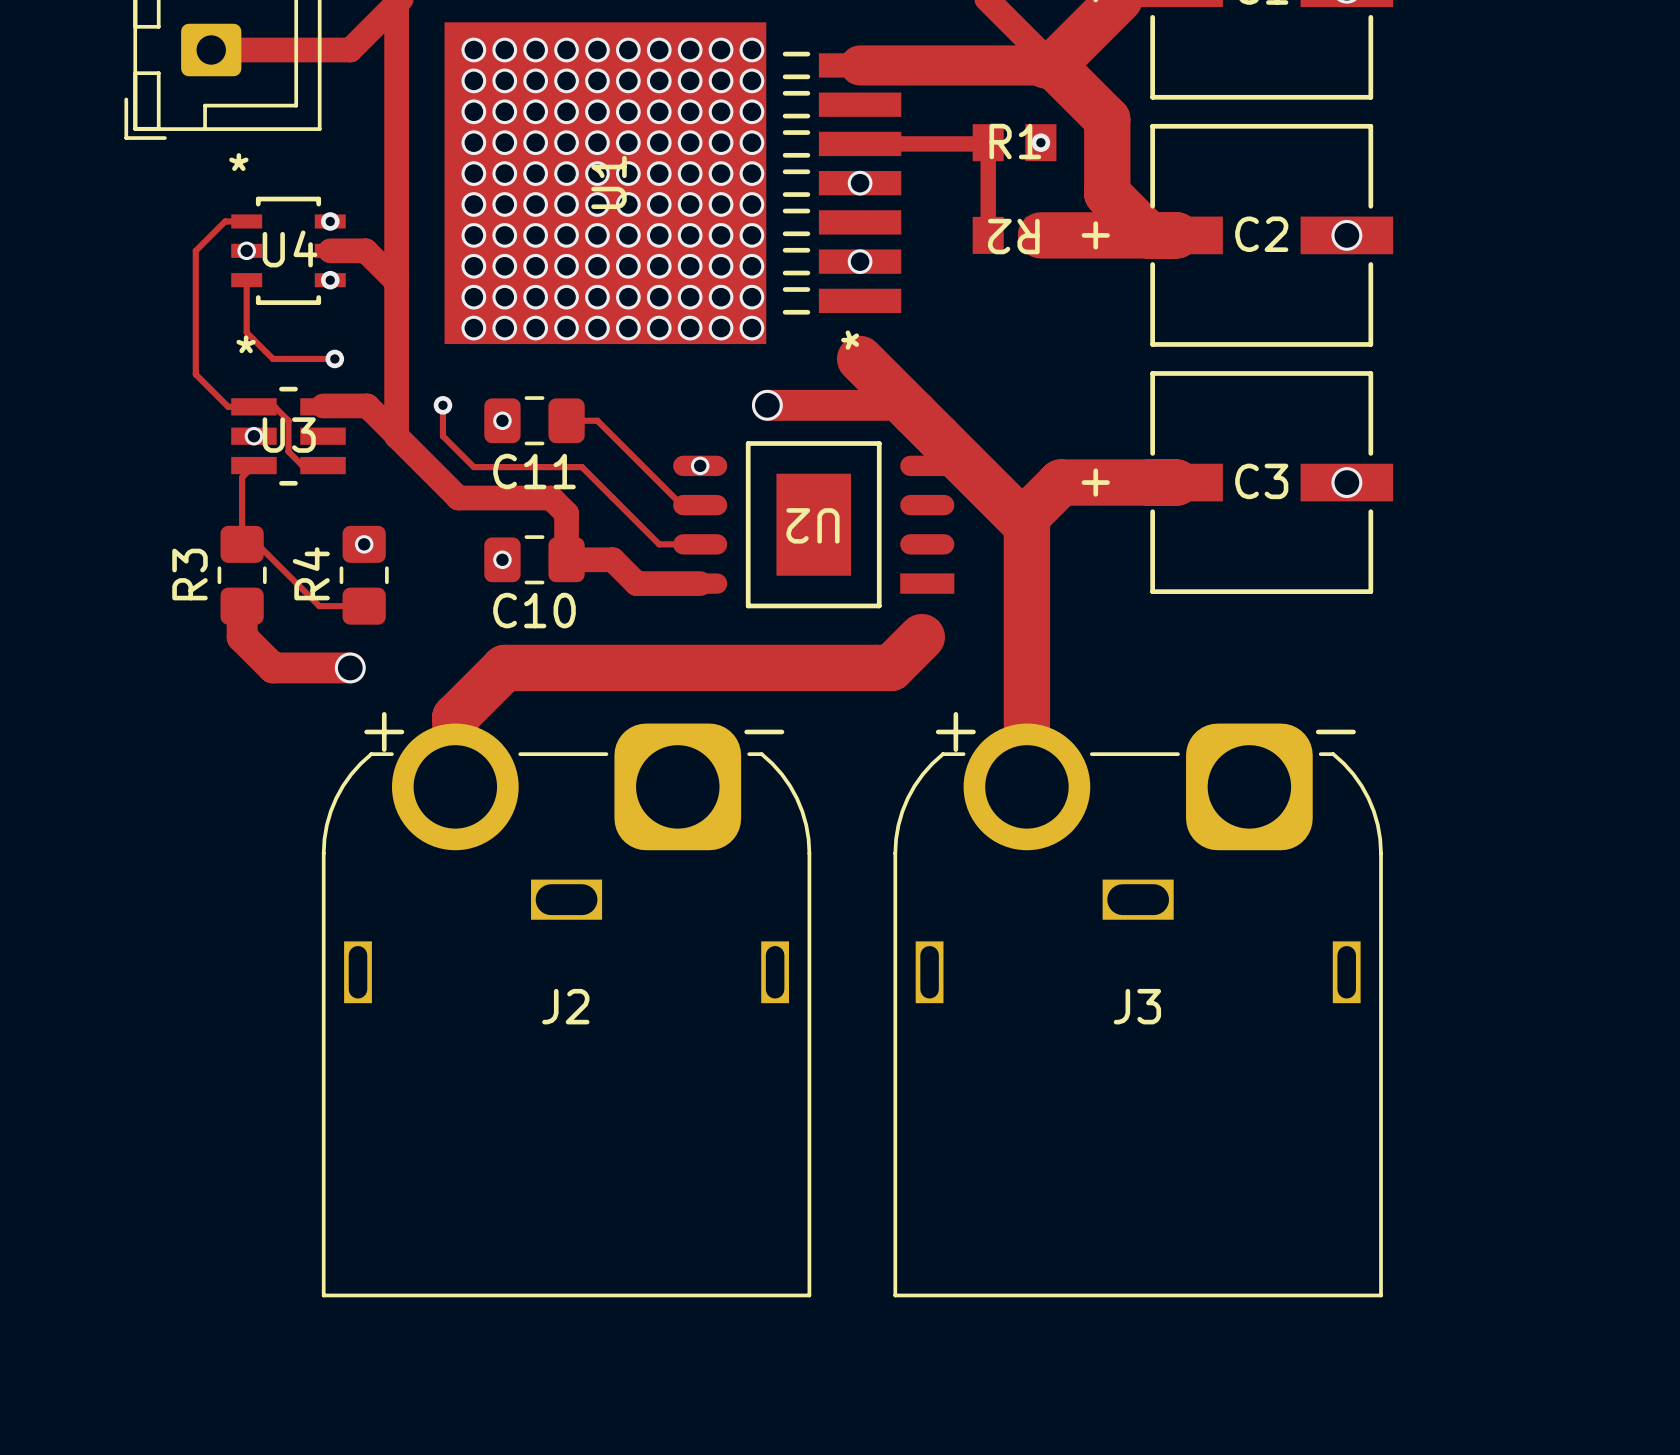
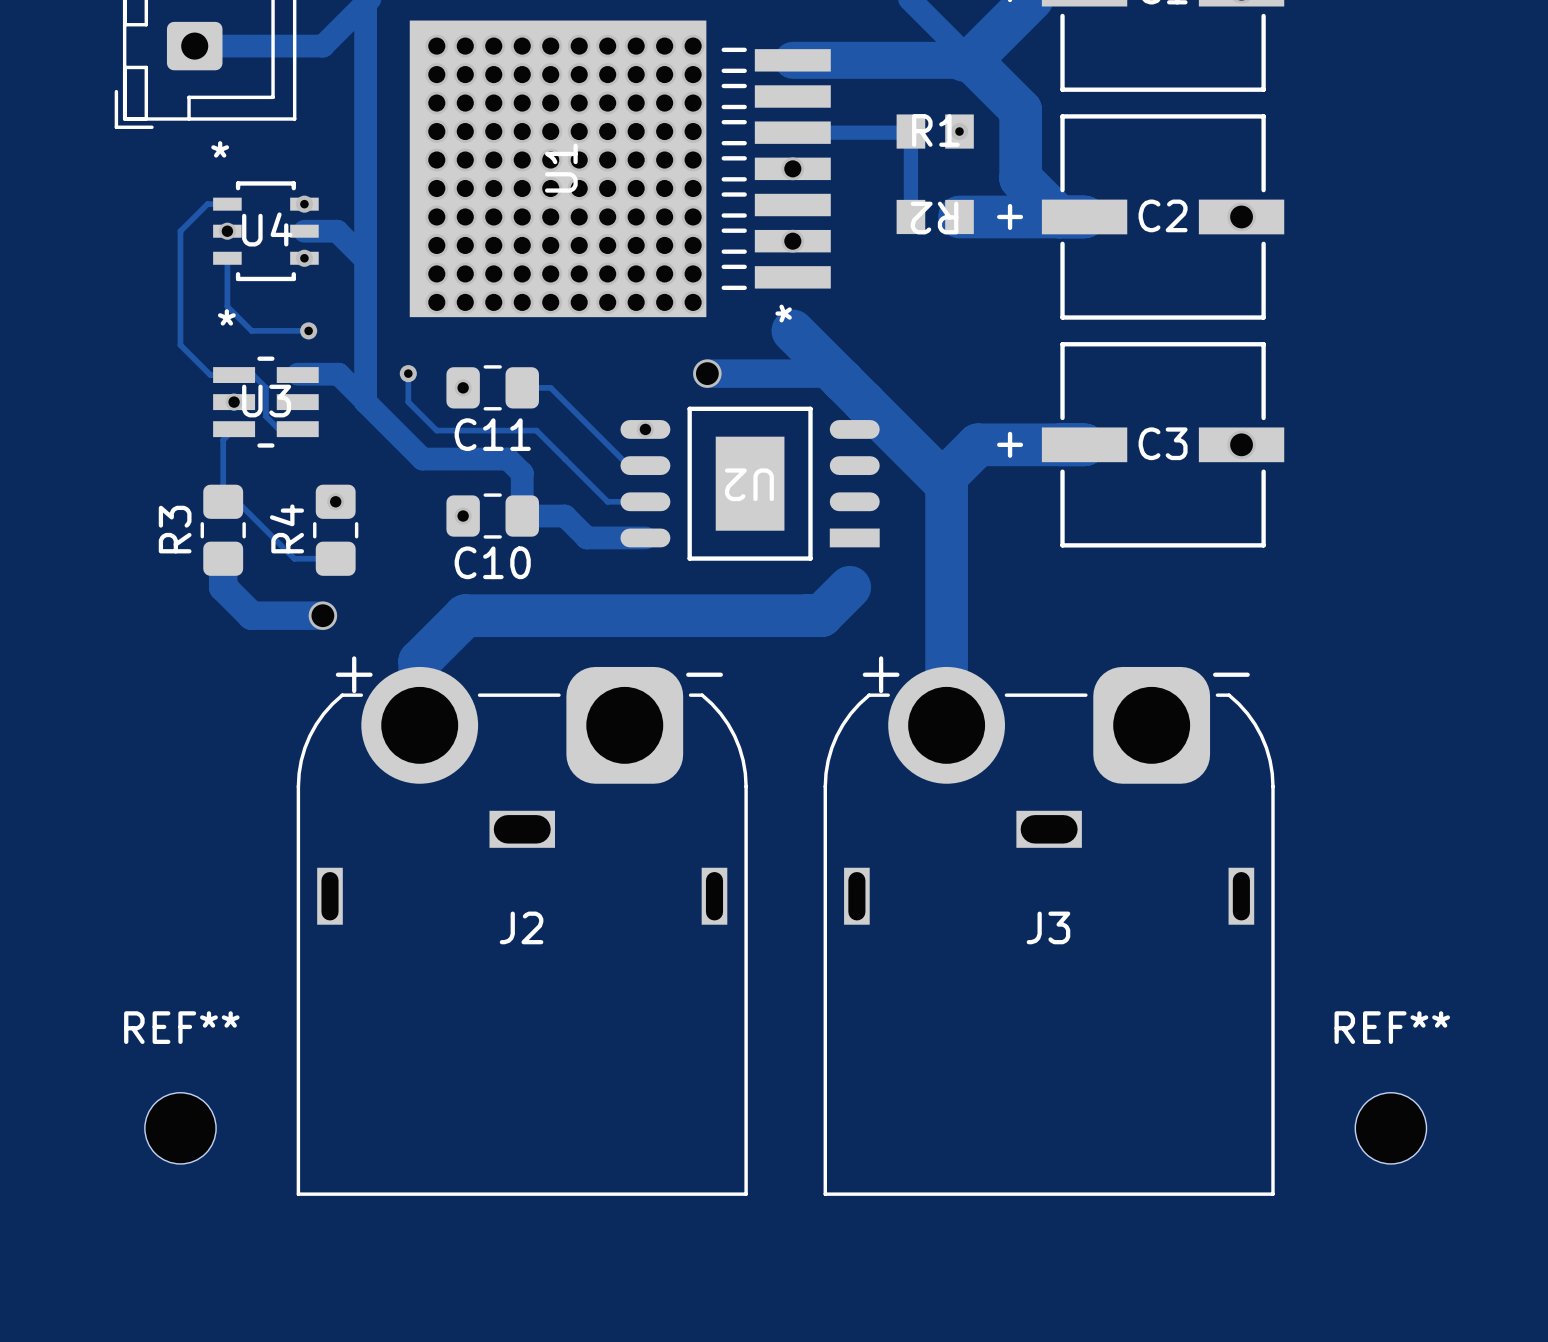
REF**: none -> (180, 1128)
REF**: none -> (1390, 1128)

